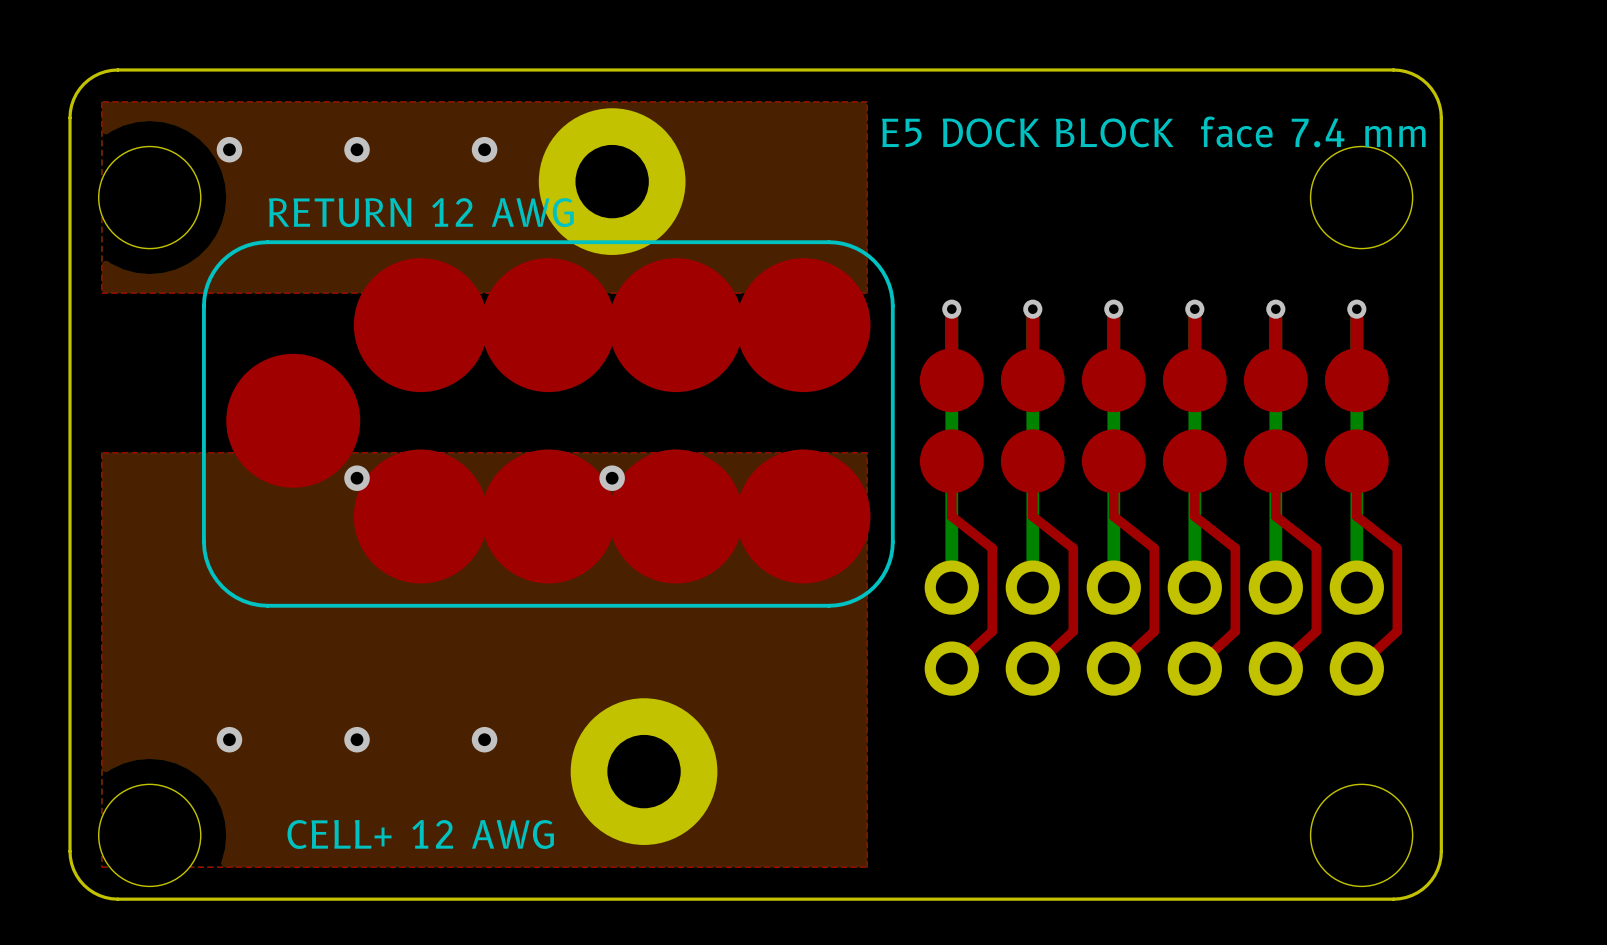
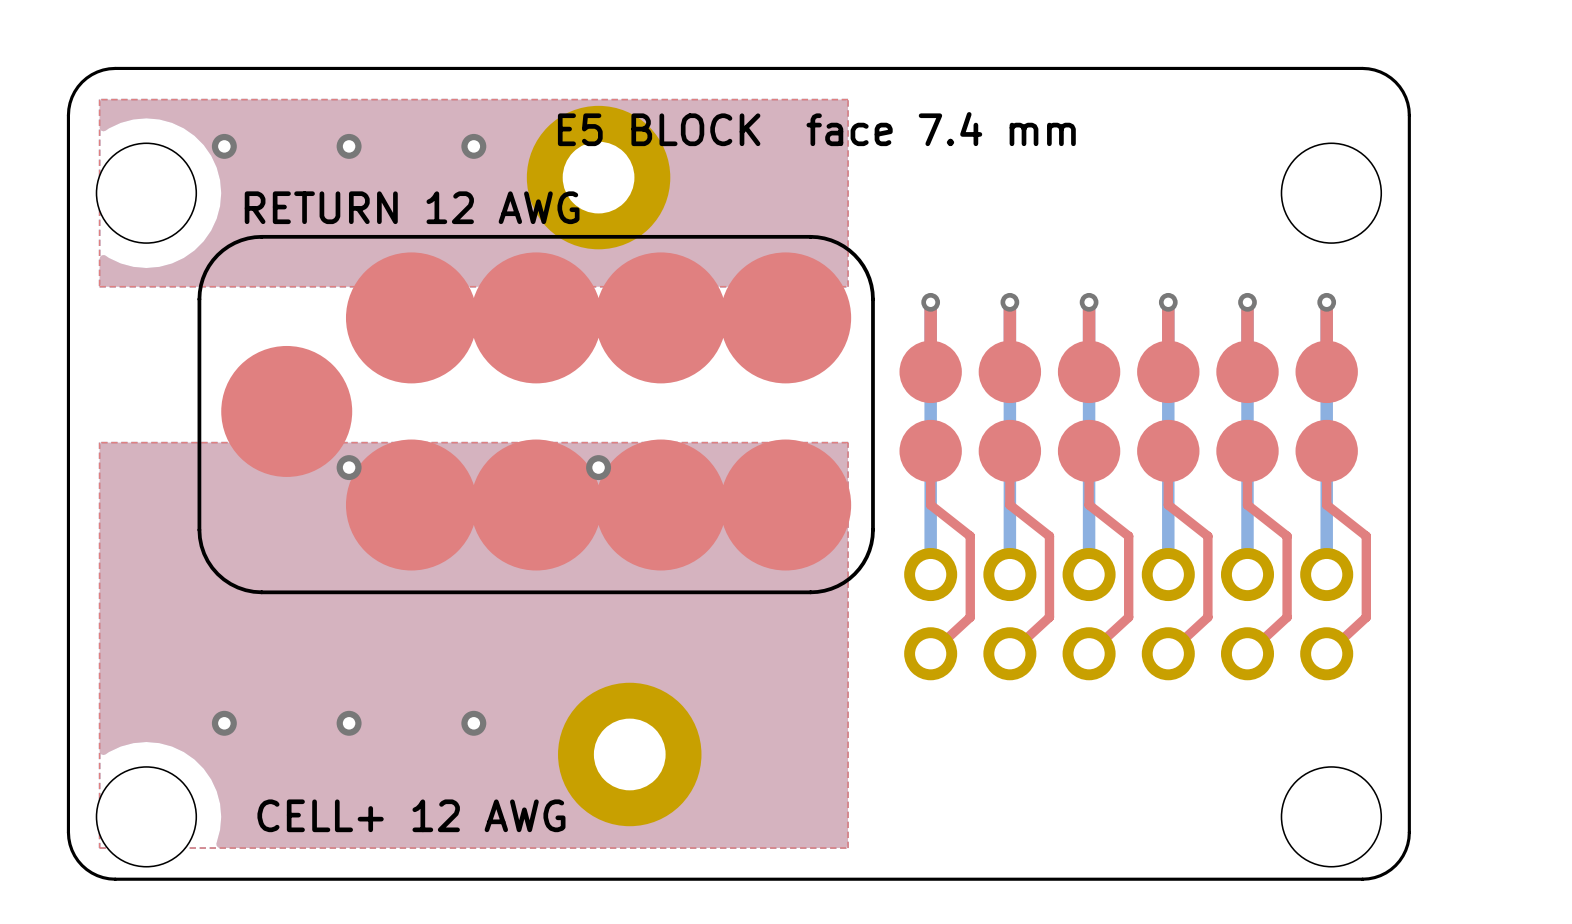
text: E5 DOCK BLOCK face 7.4 mm (1153, 131) -> E5 BLOCK face 7.4 mm (816, 129)

